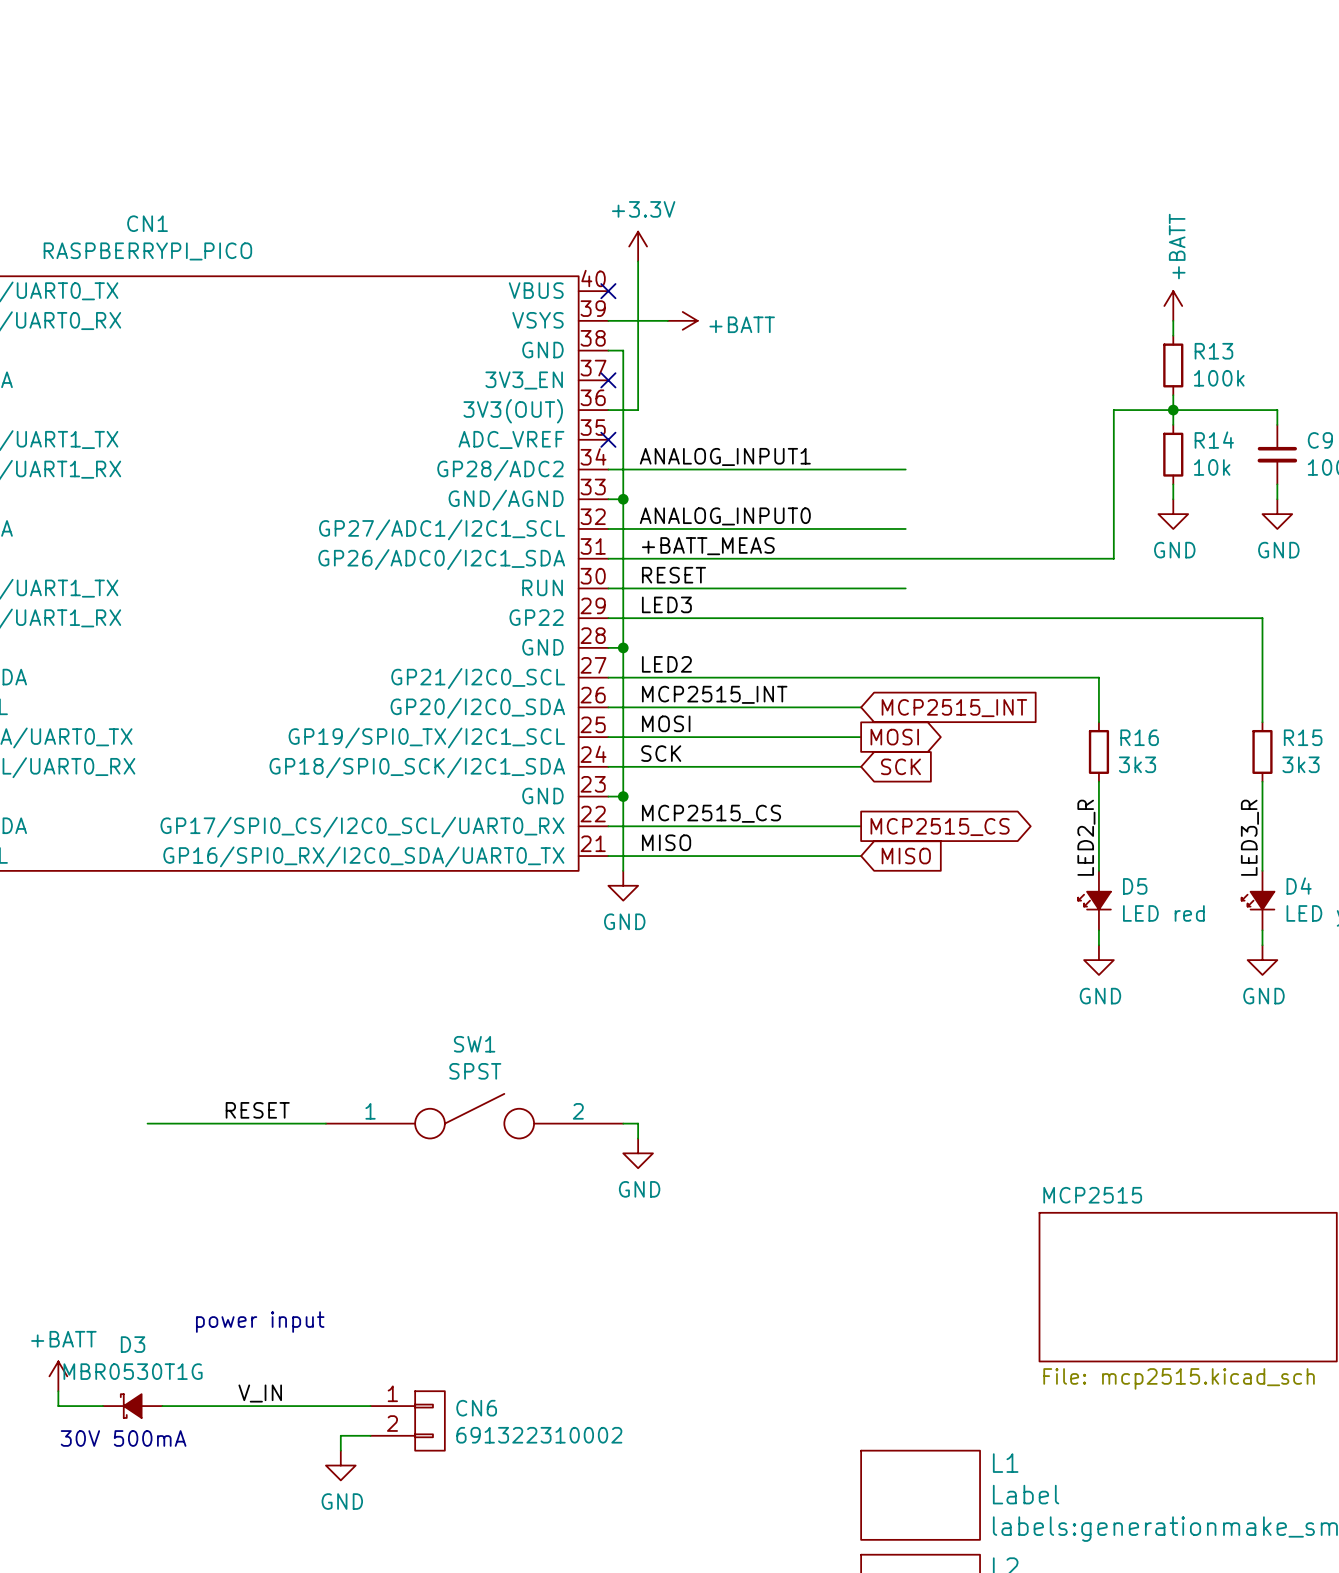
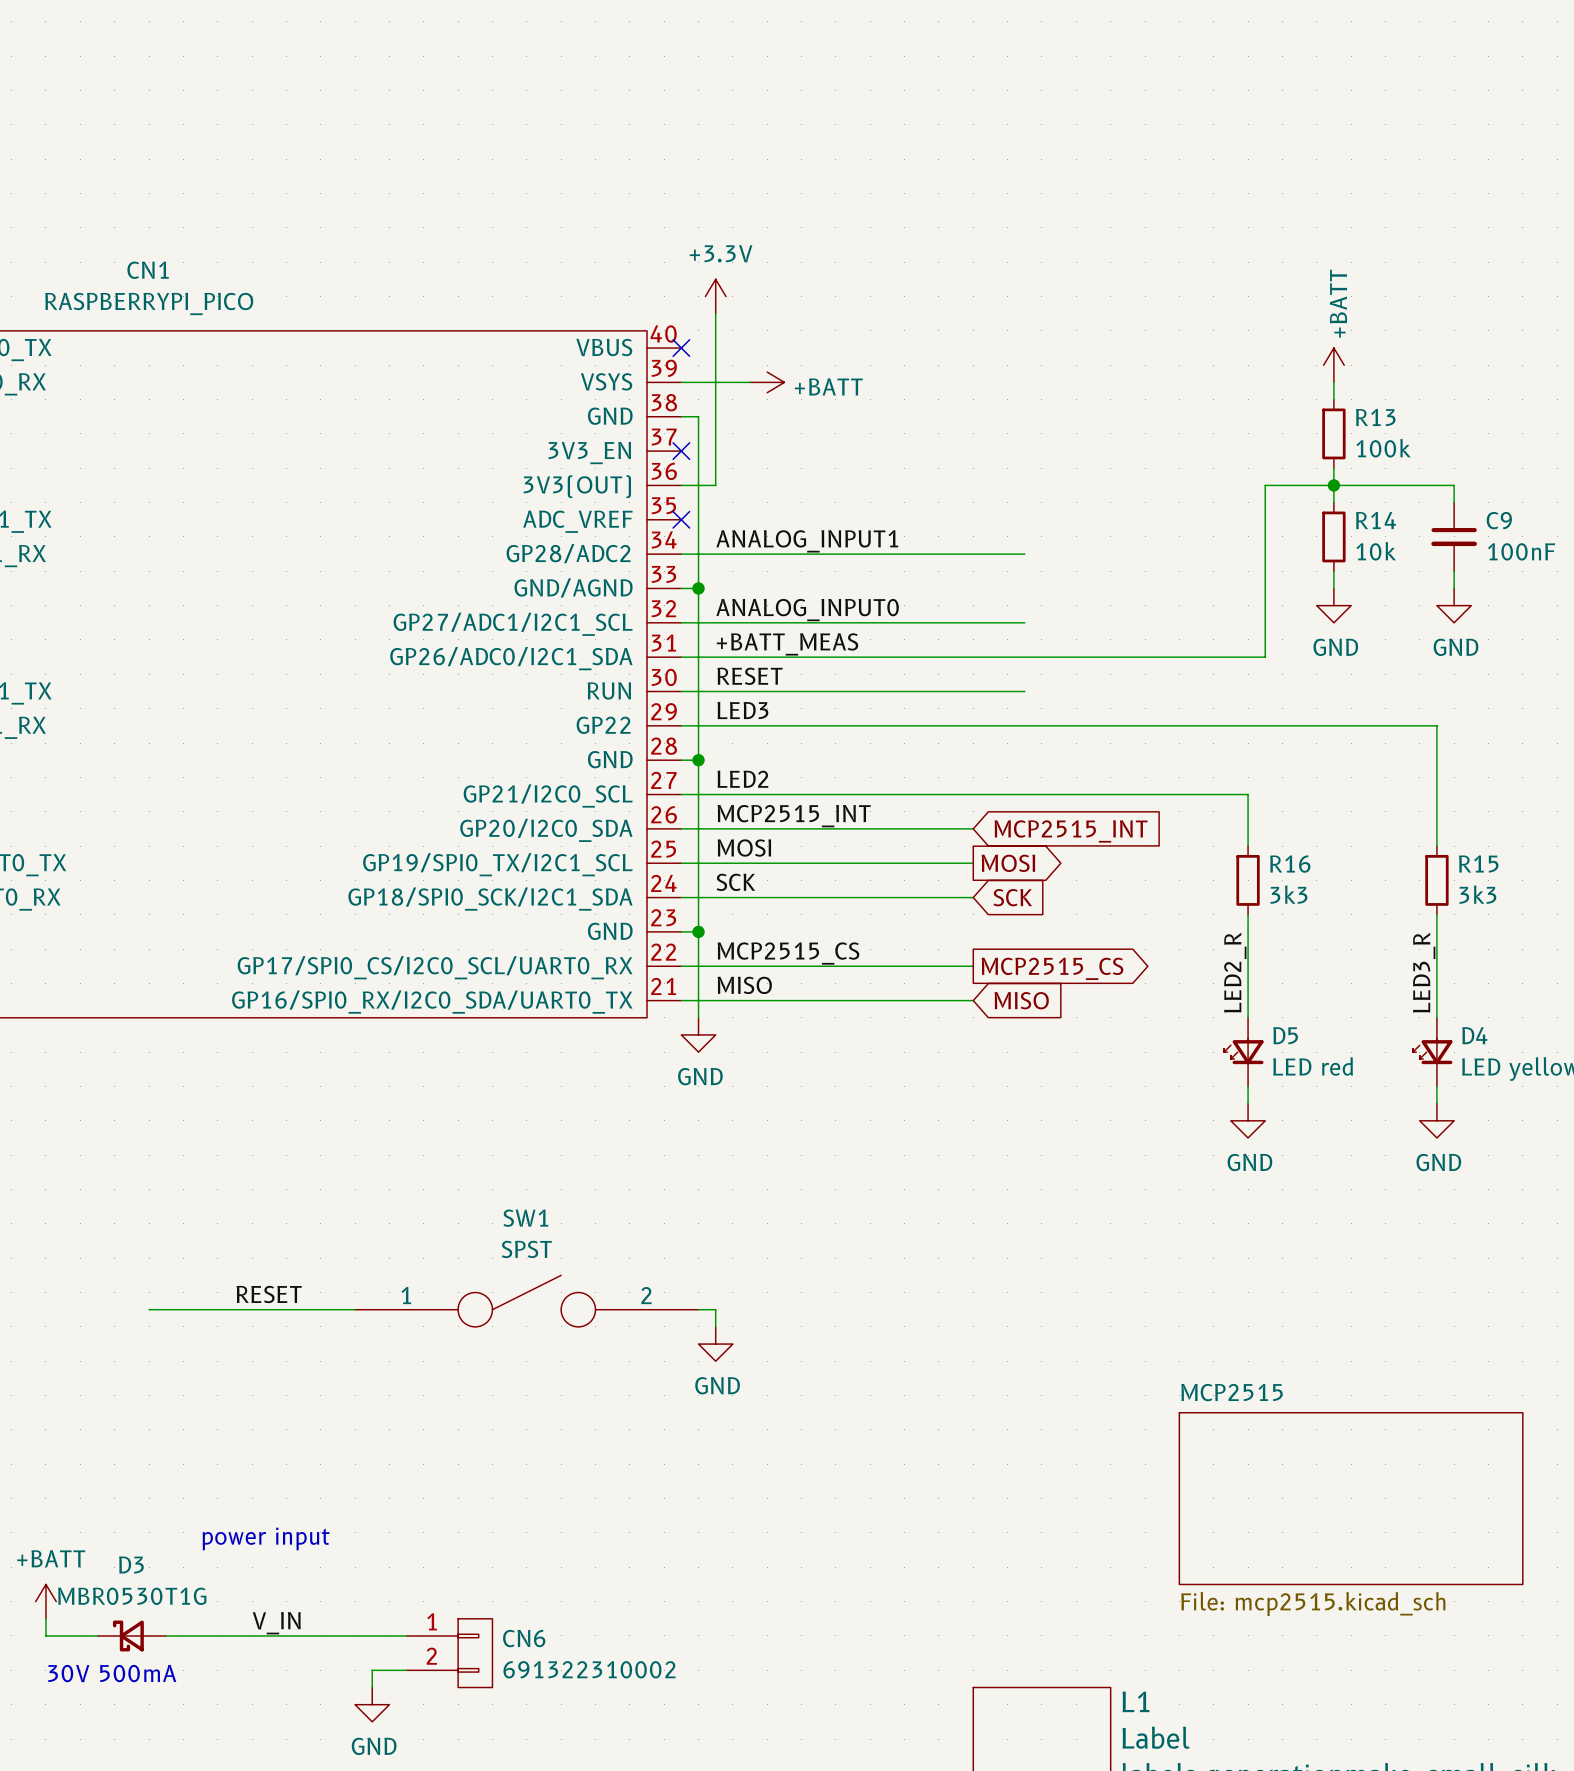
D5 symbol: [1078, 870, 1111, 931] -> [1224, 1017, 1264, 1087]
D4 symbol: [1241, 870, 1275, 931] -> [1412, 1017, 1453, 1087]
D3 symbol: [102, 1394, 163, 1418] -> [97, 1620, 167, 1652]

